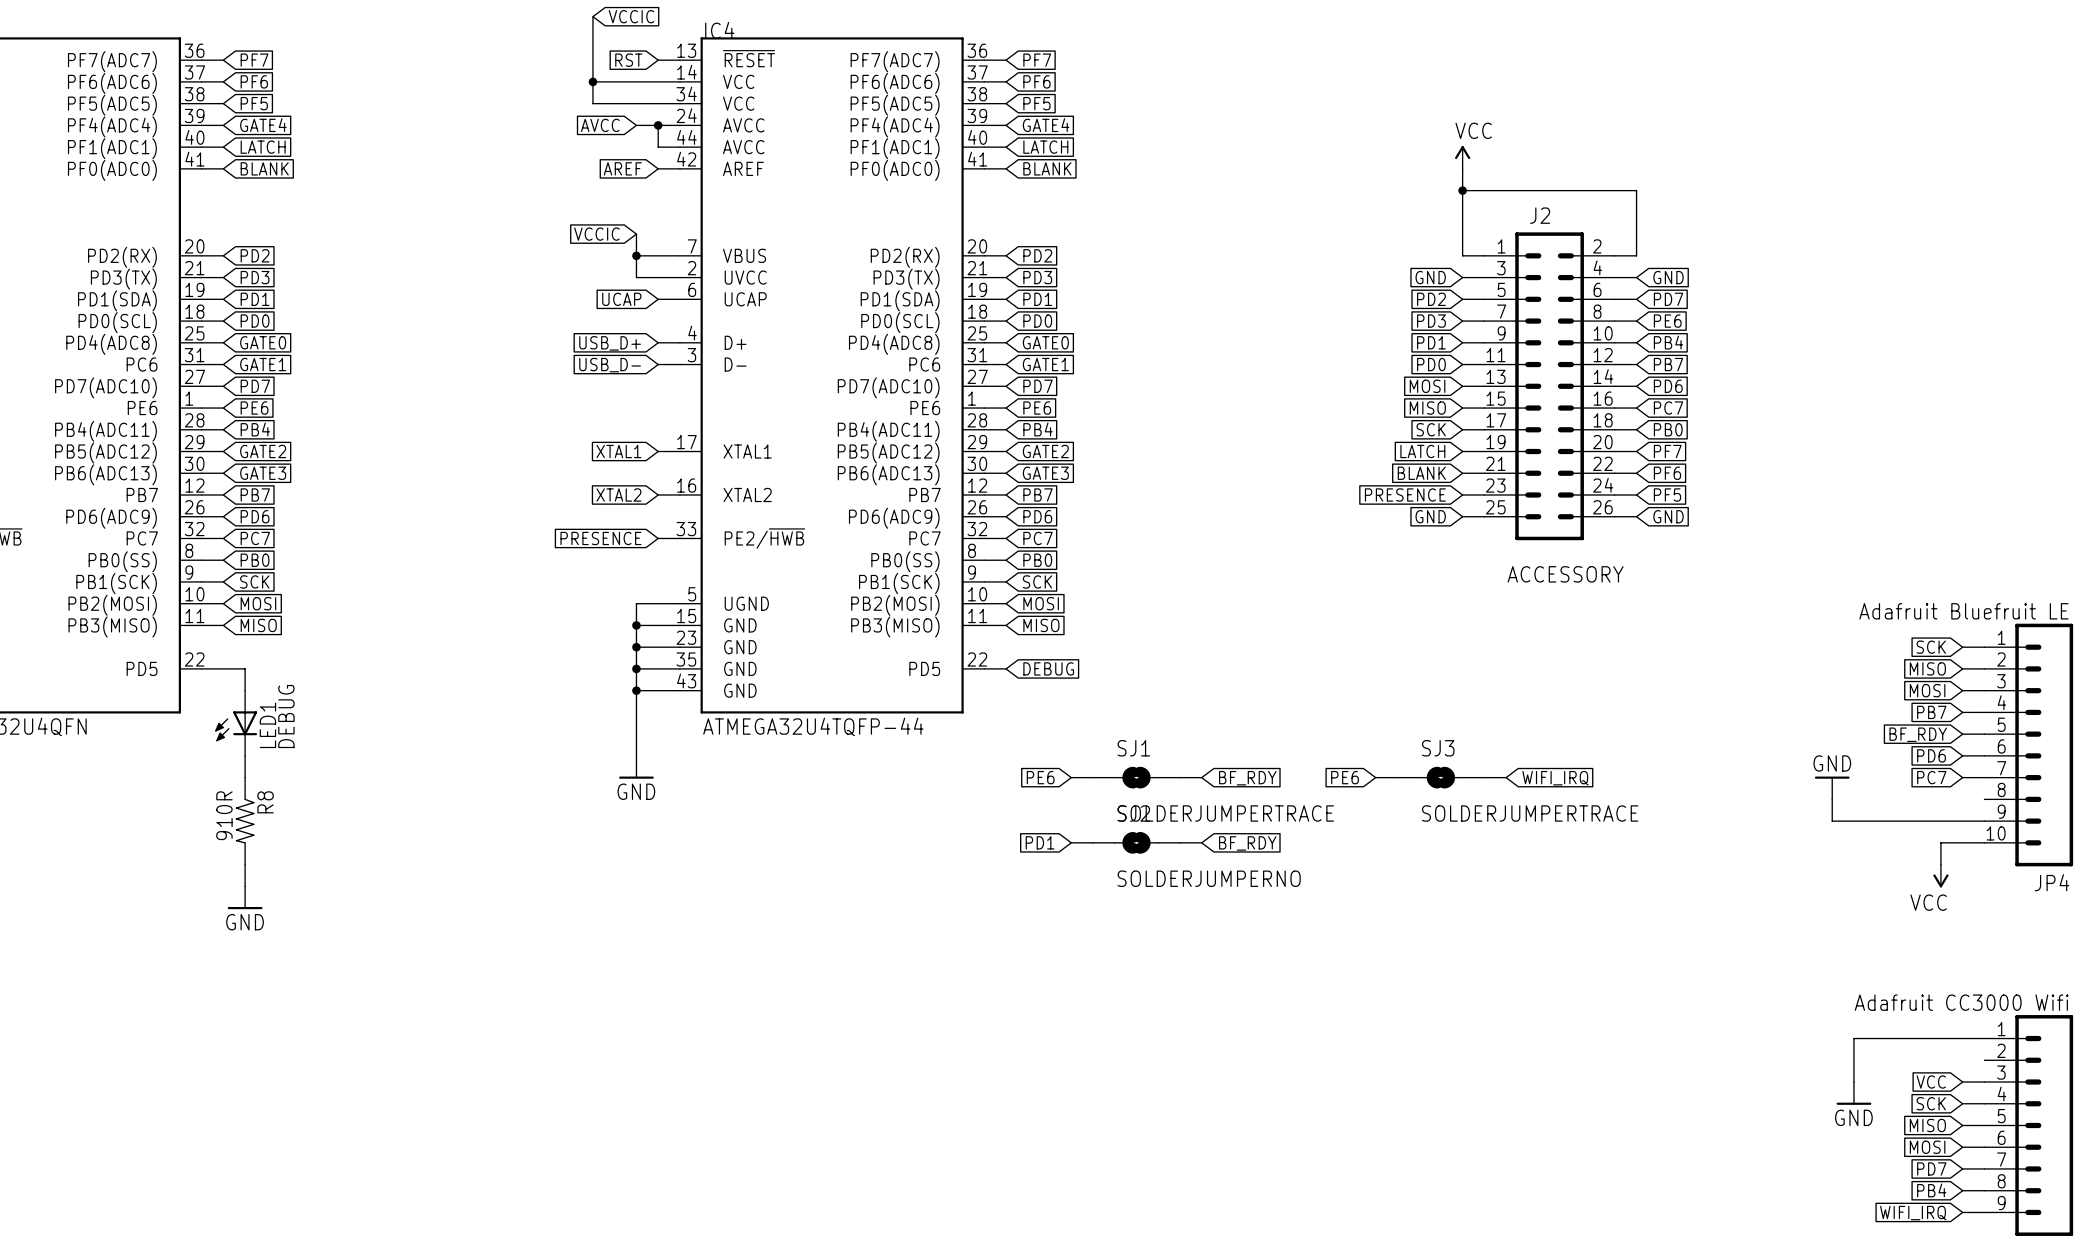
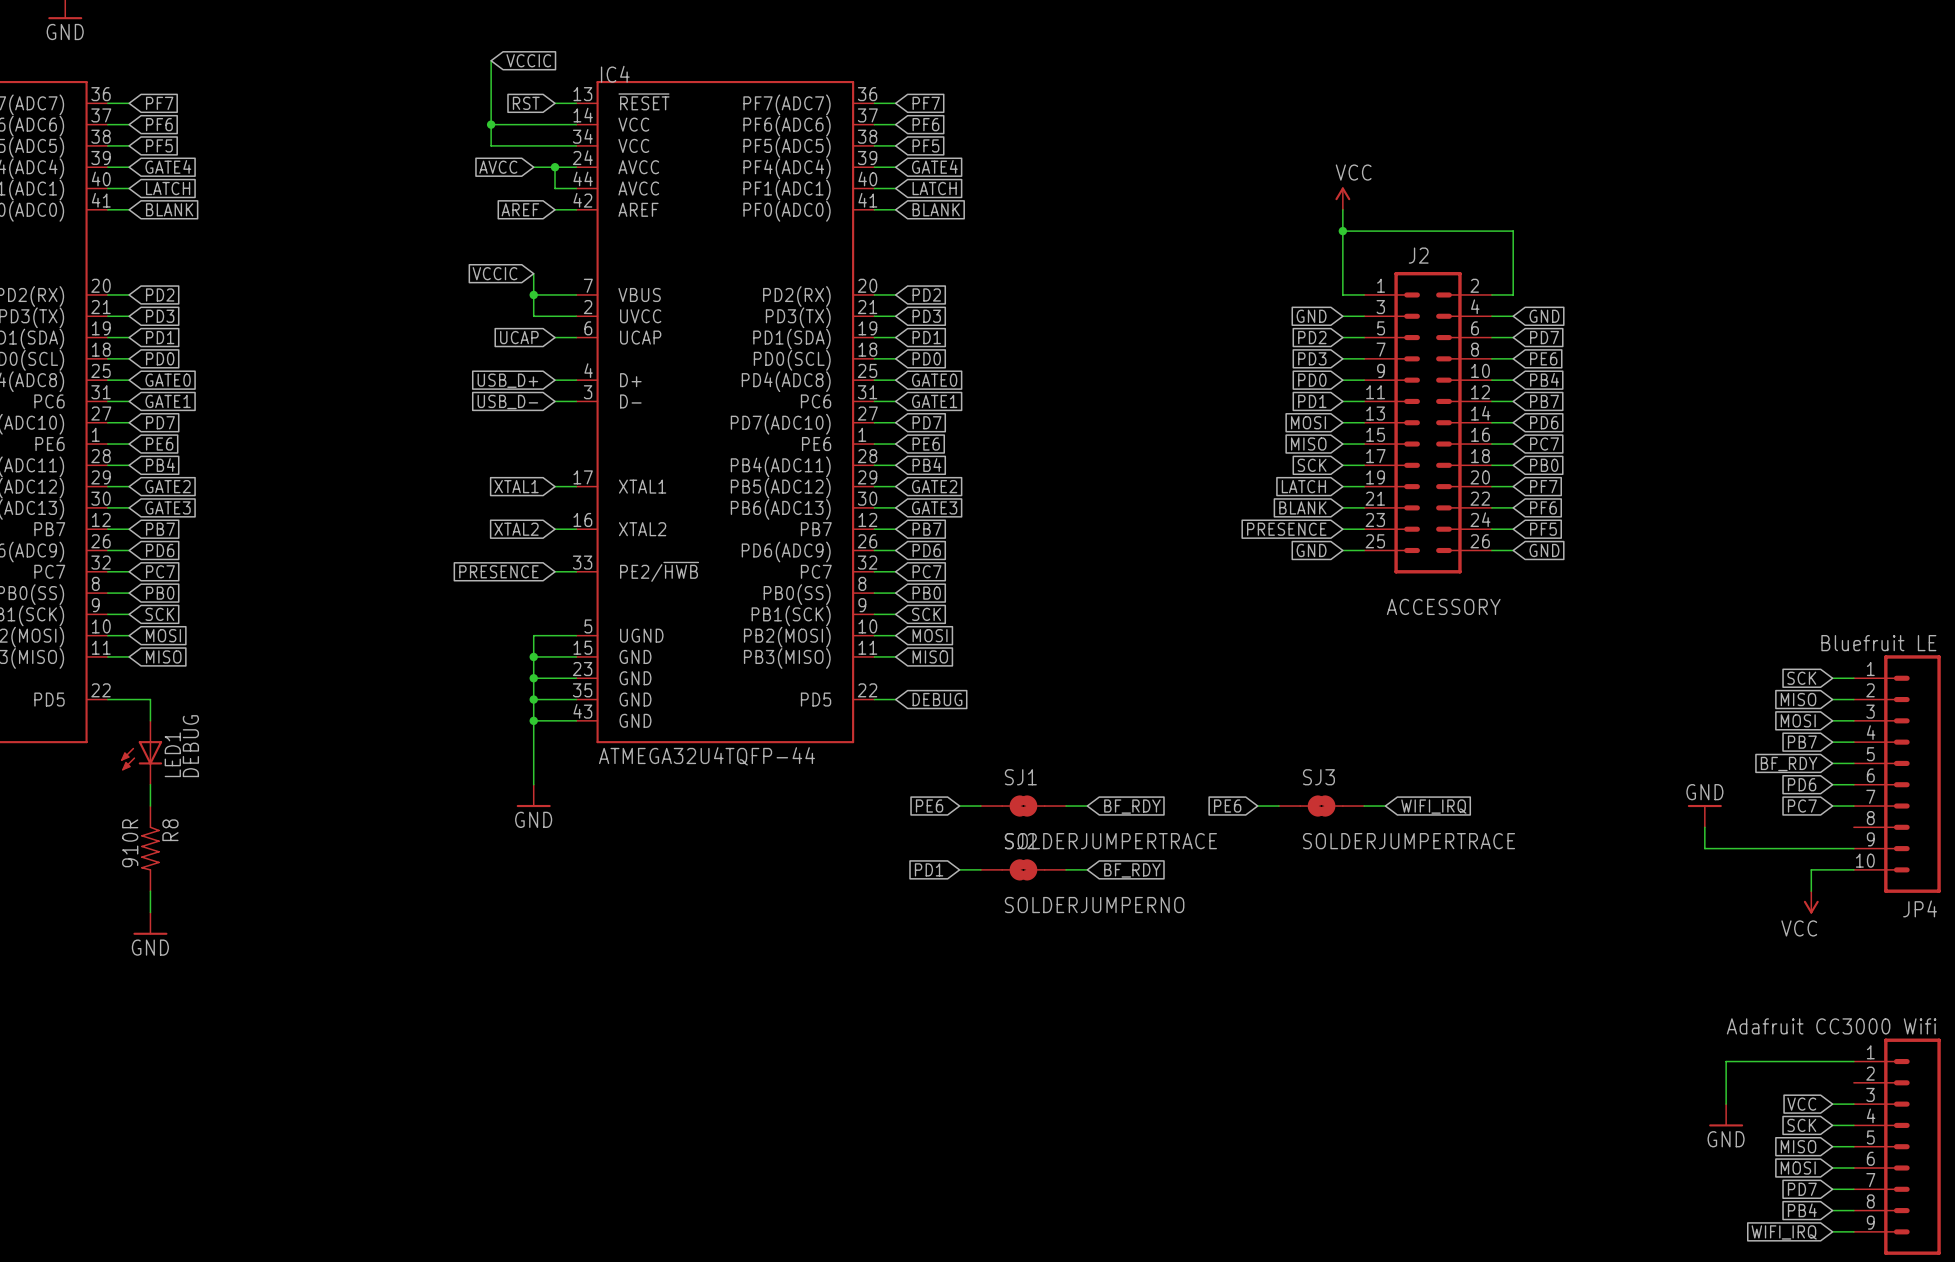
global label: PD1 (1431, 342) -> PD0 (1312, 380)
global label: PD0 (1431, 364) -> PD1 (1312, 401)
JP4 value: Adafruit Bluefruit LE (1963, 611) -> Bluefruit LE (1878, 643)

